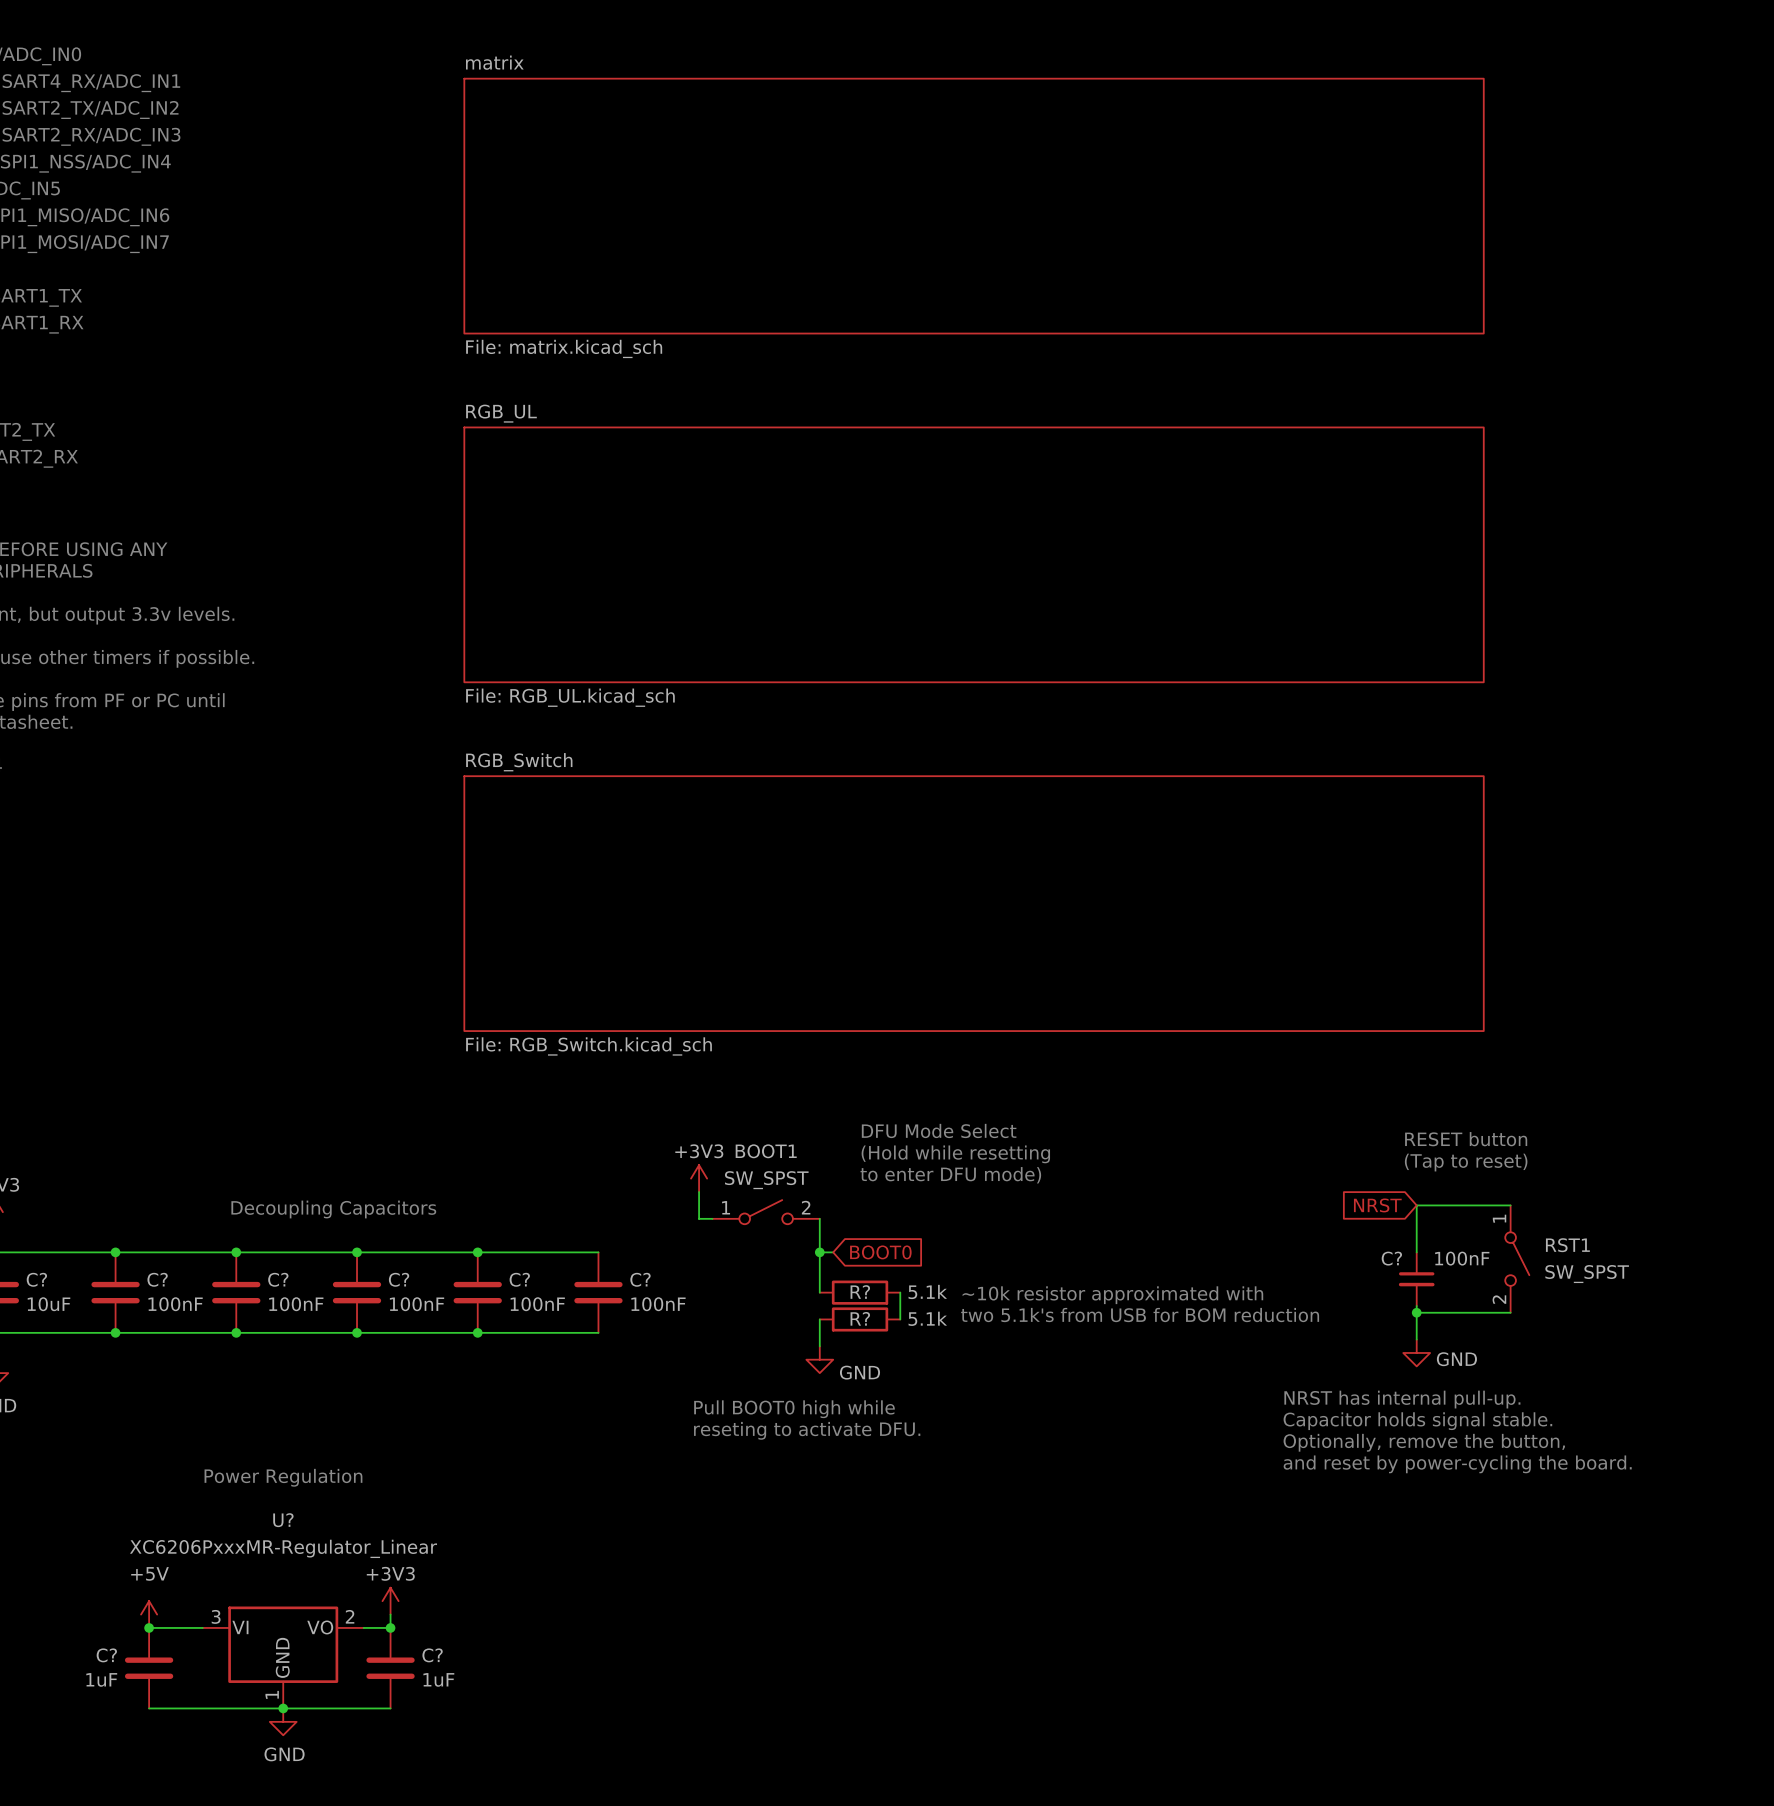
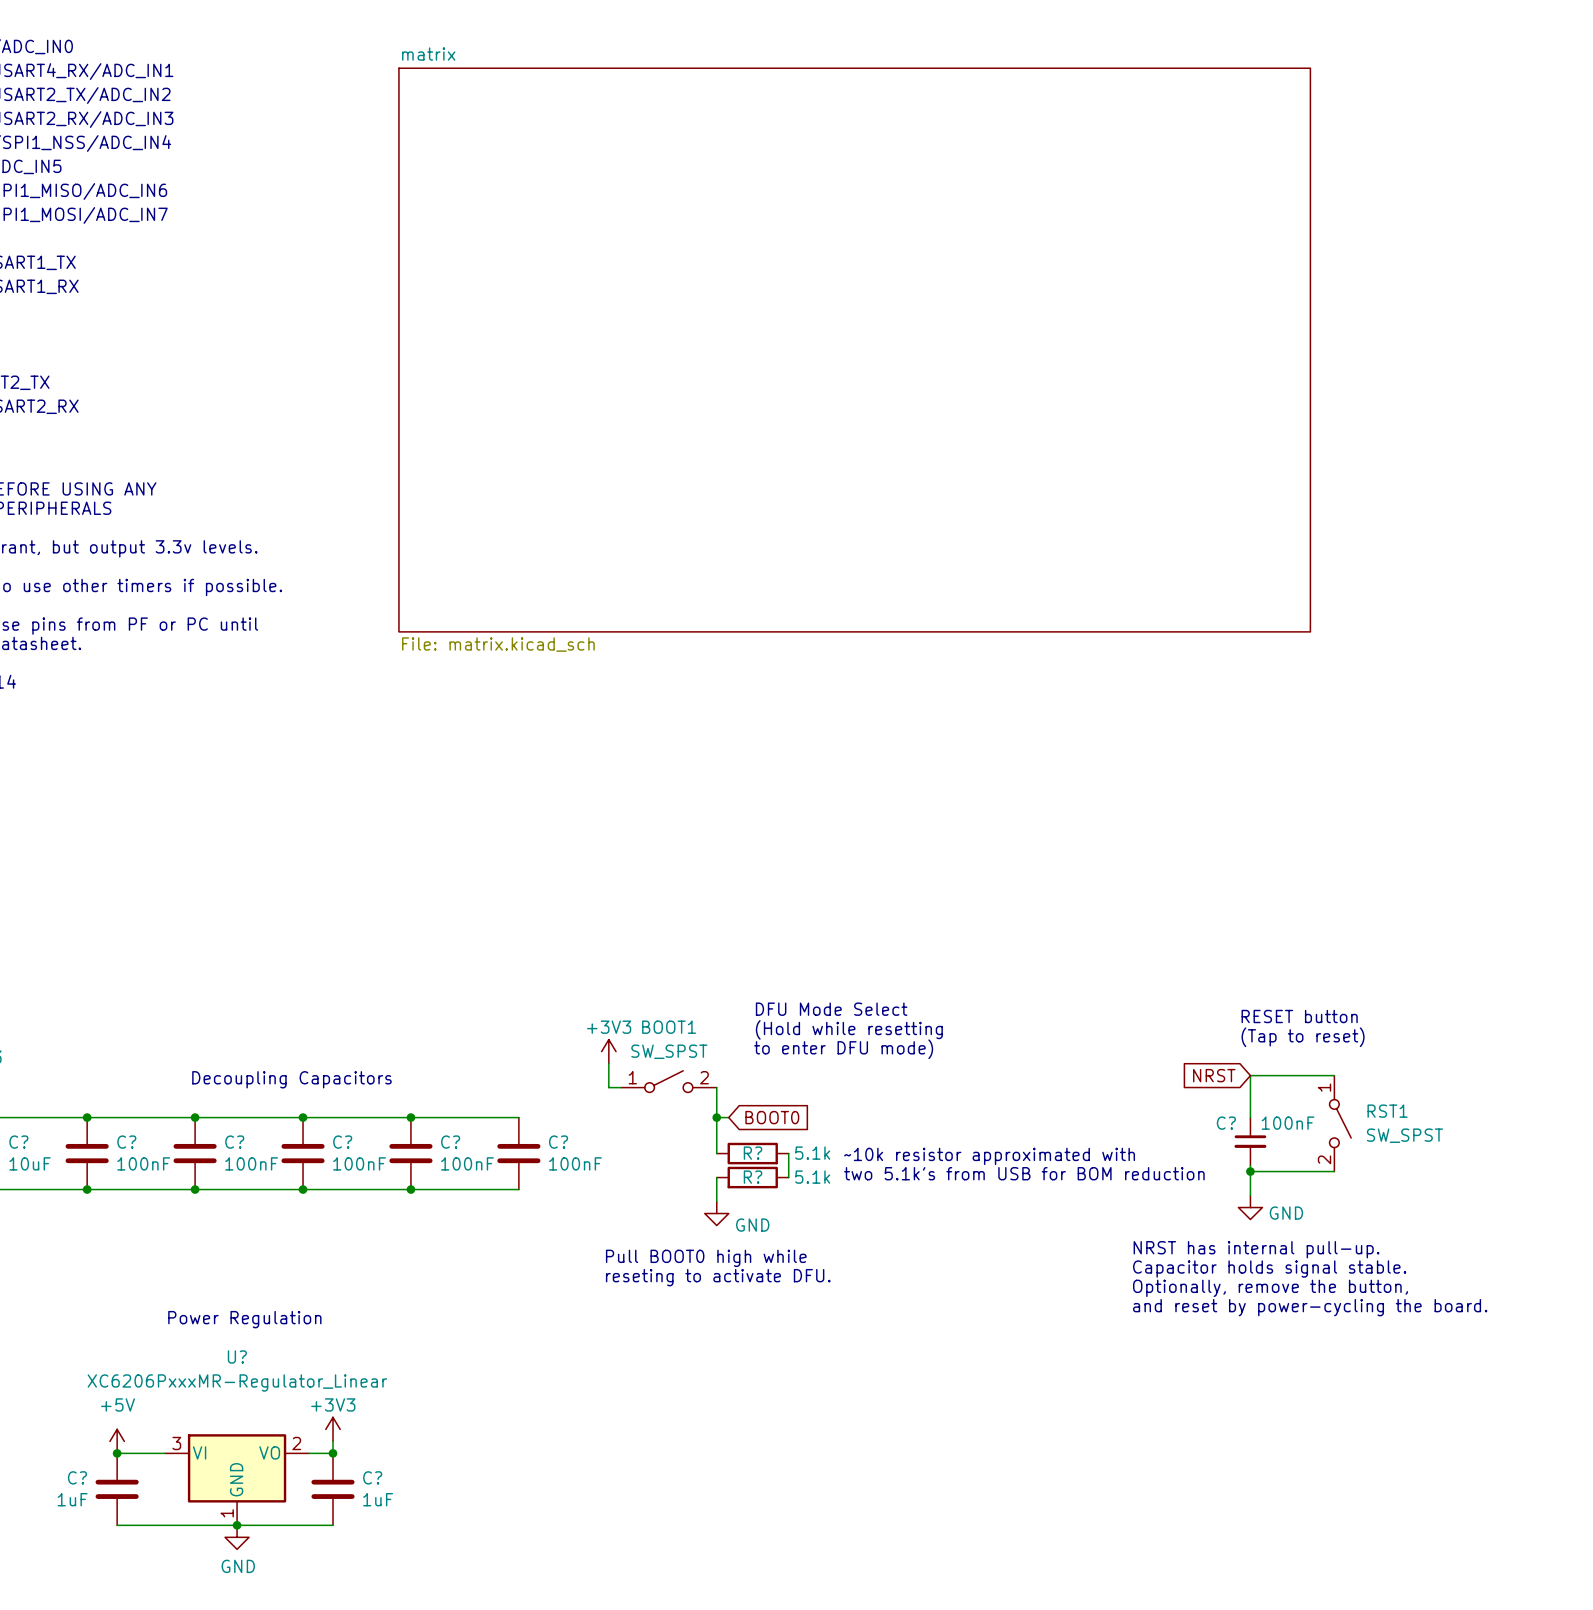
sheet matrix: File: matrix.kicad_sch (974, 206) -> none
sheet matrix: none -> File: matrix.kicad_sch (854, 350)
sheet RGB_UL: File: RGB_UL.kicad_sch (974, 554) -> none
sheet RGB_Switch: File: RGB_Switch.kicad_sch (974, 903) -> none

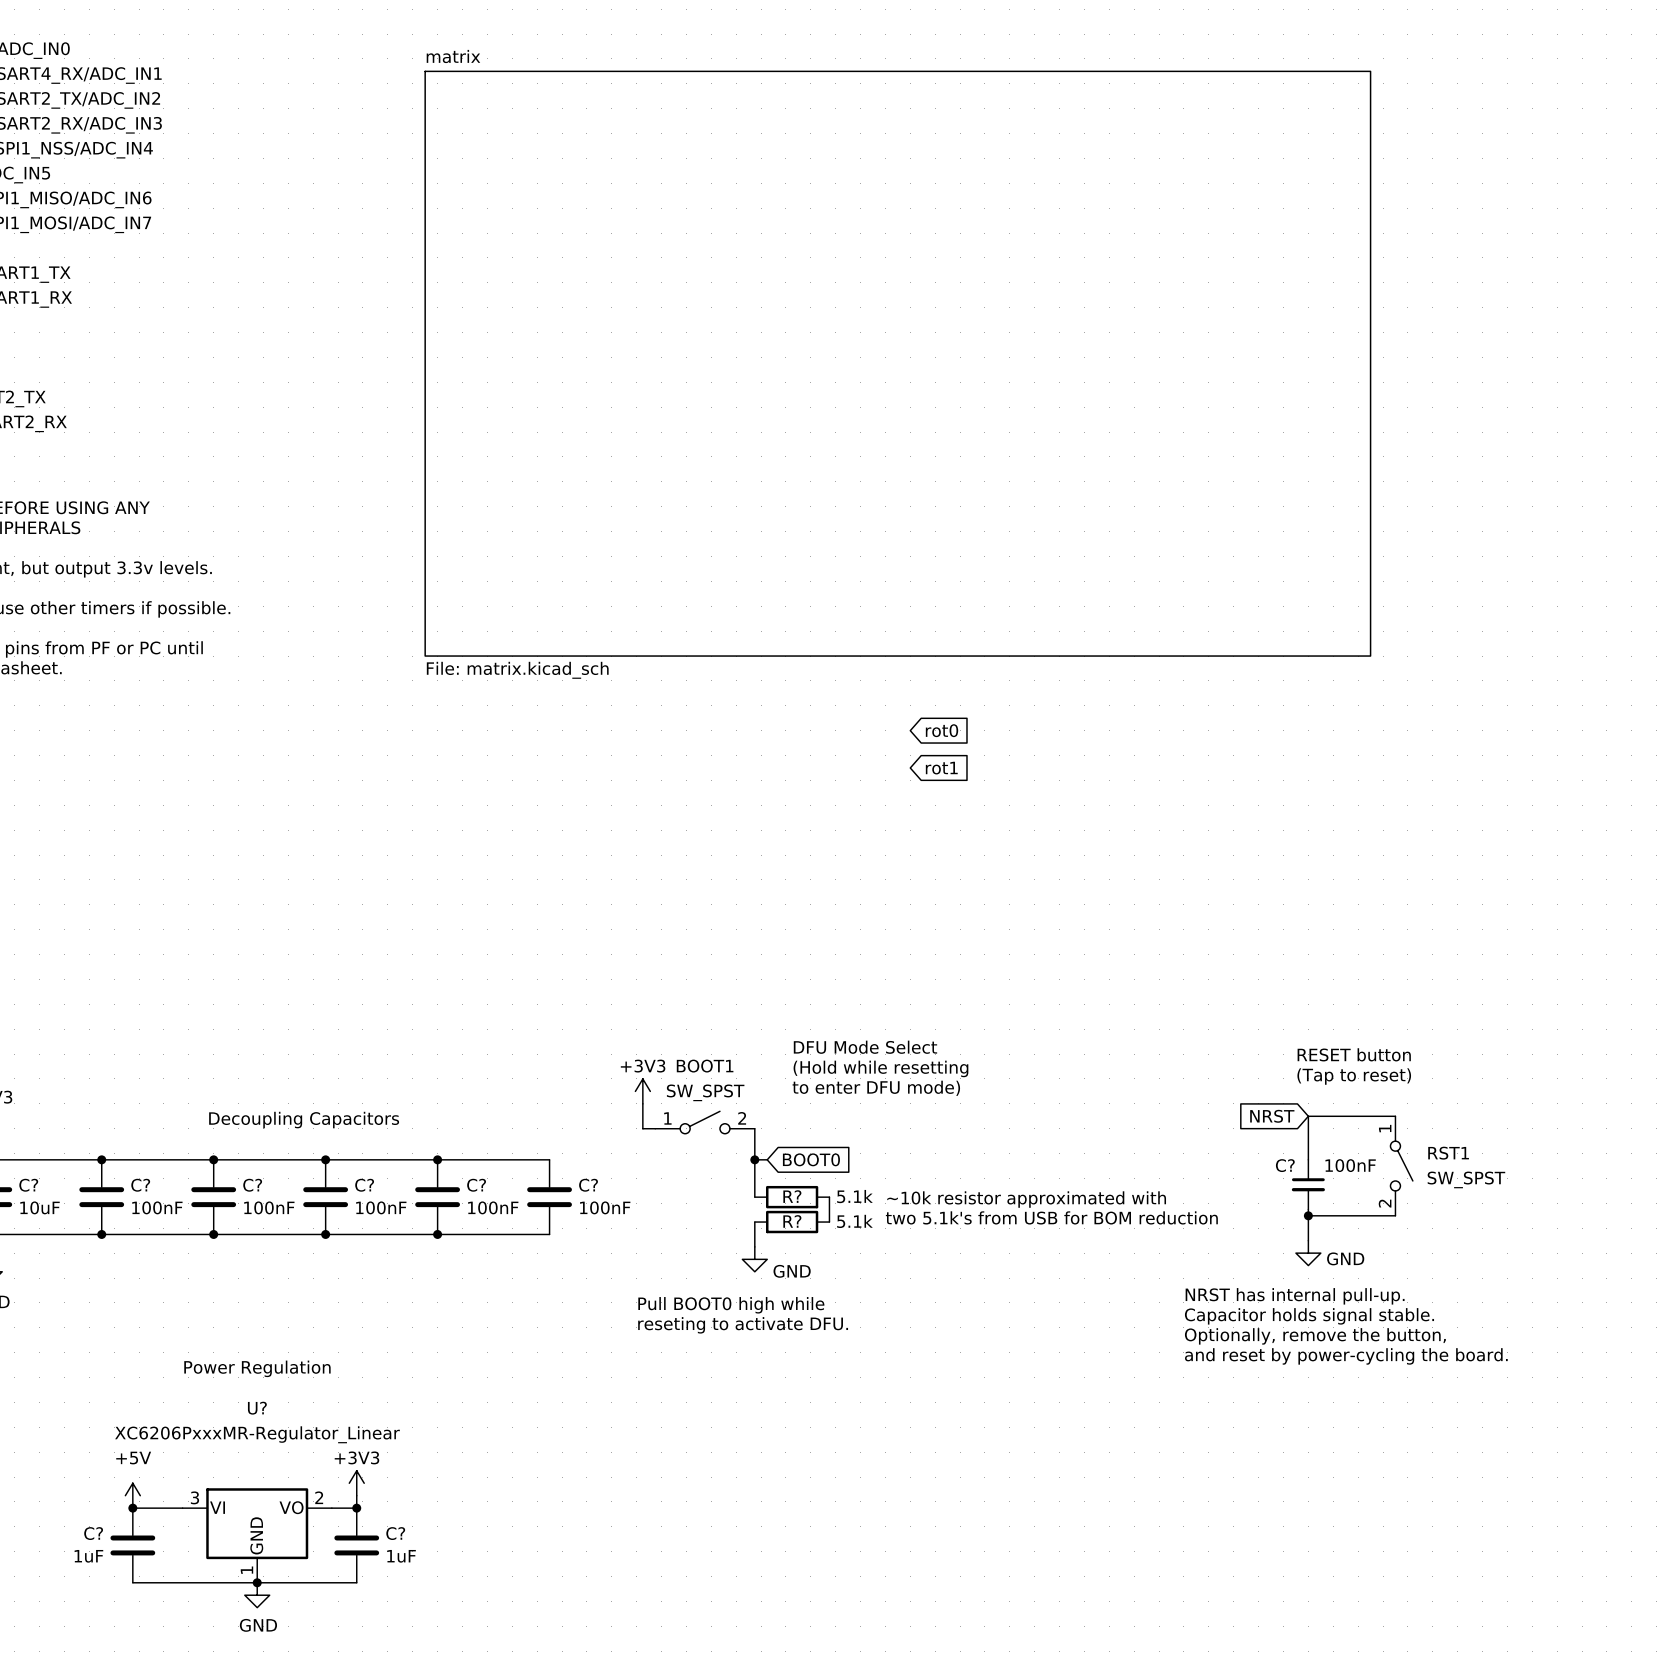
global label: none -> rot0 (942, 730)
global label: none -> rot1 (941, 768)

